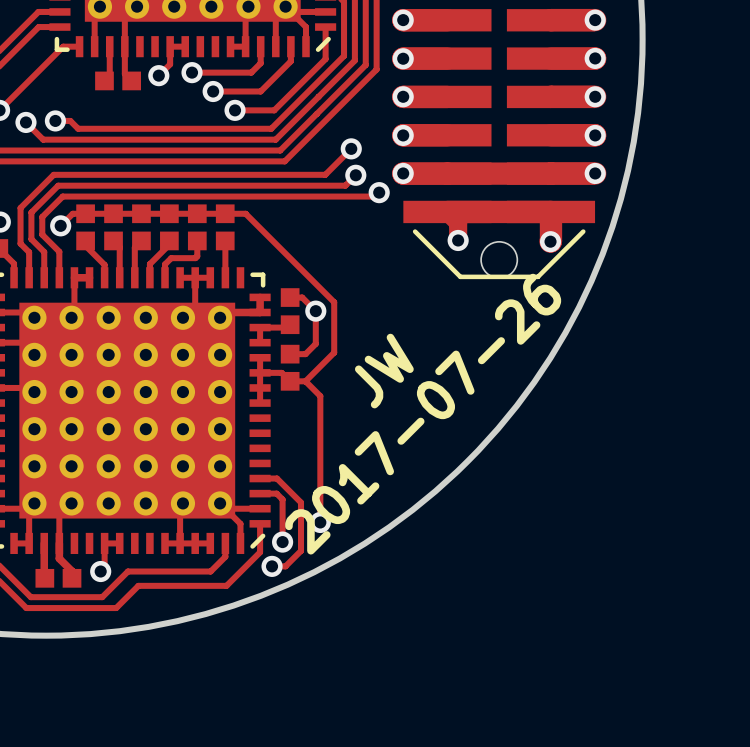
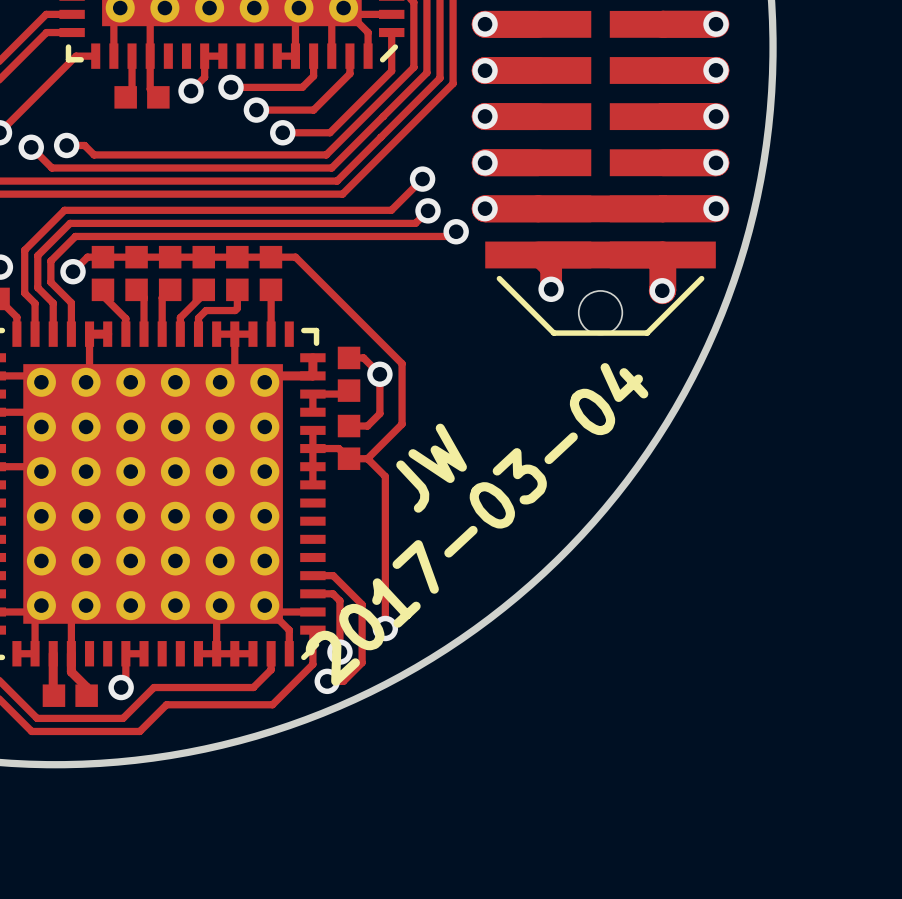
text rotation: 0° (384, 371) -> 2° clockwise (431, 468)
text: 2017-07-26 (423, 414) -> 2017-03-04 (477, 524)

